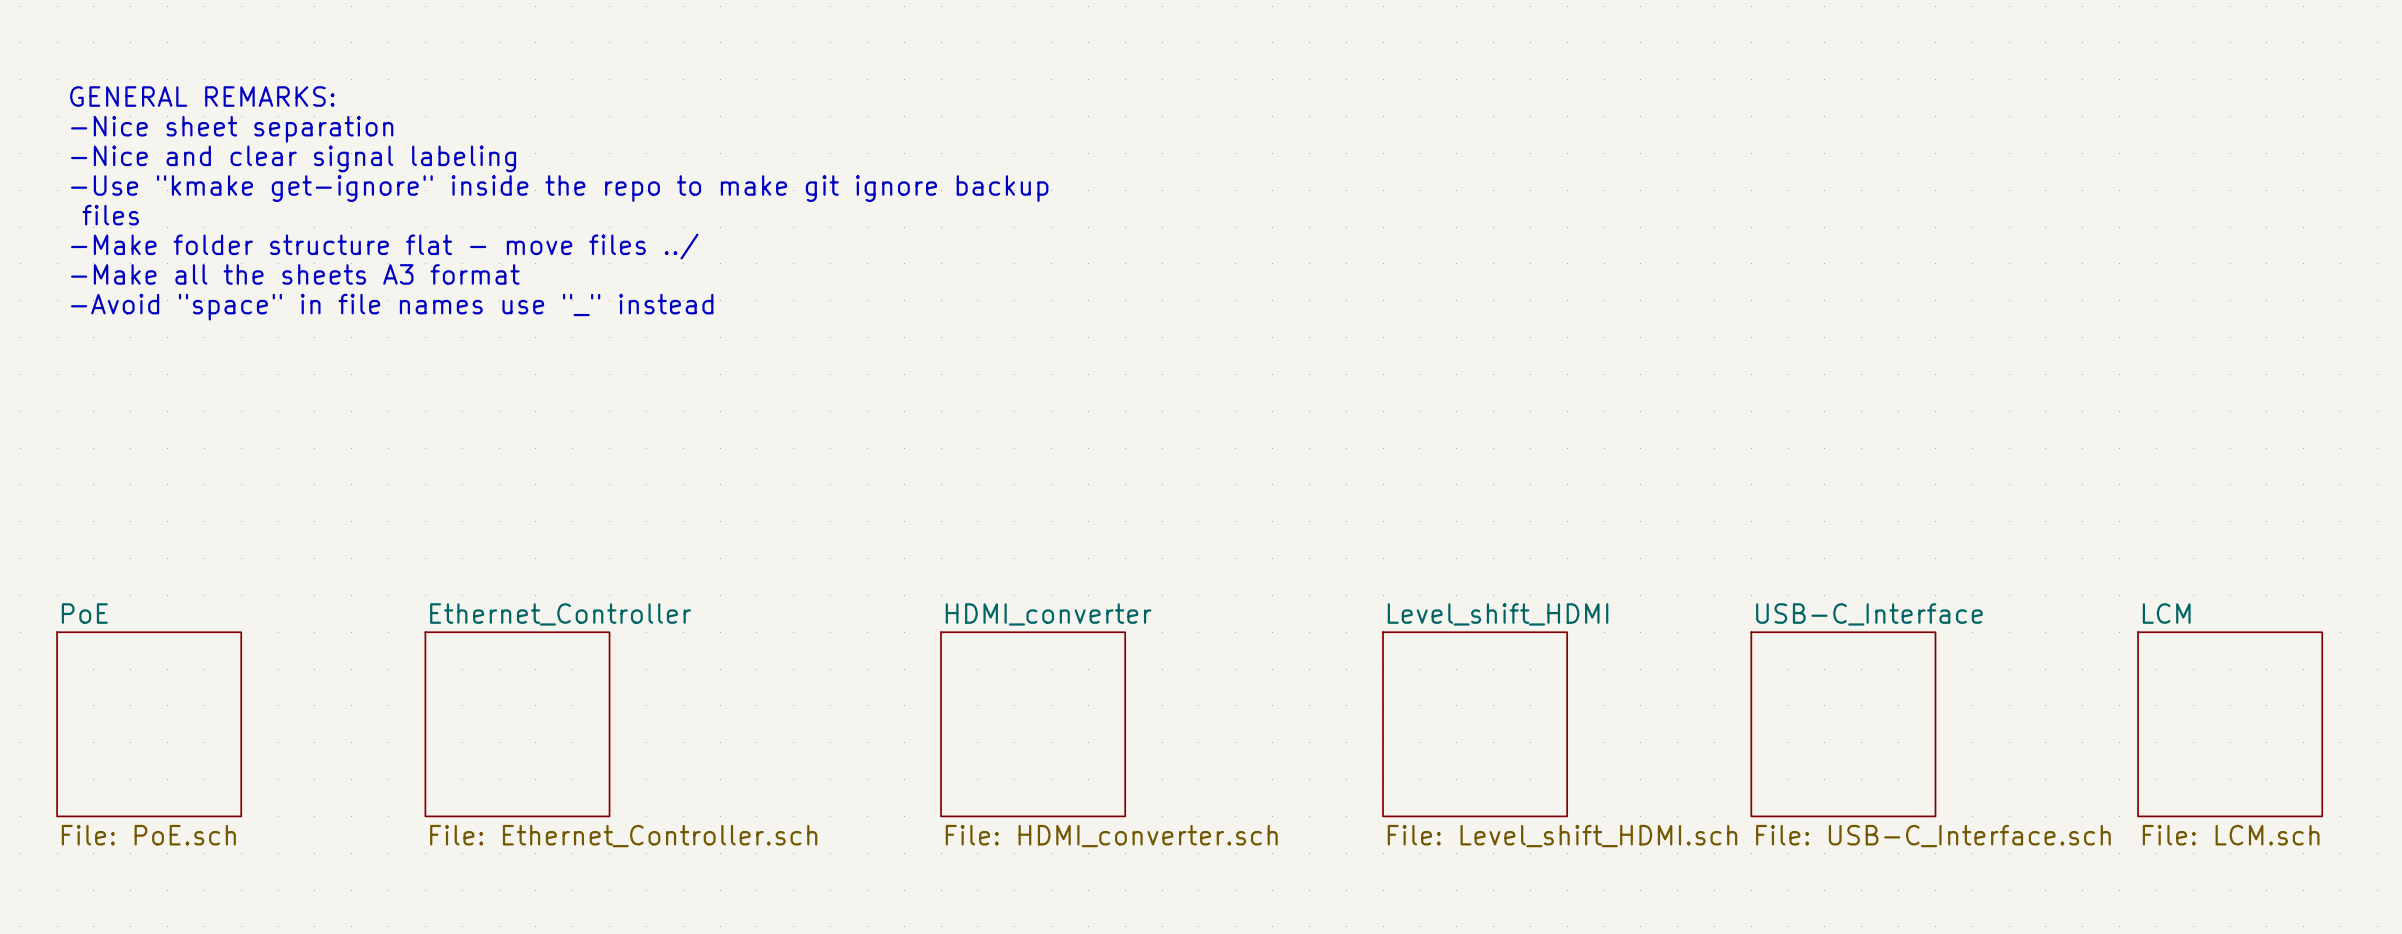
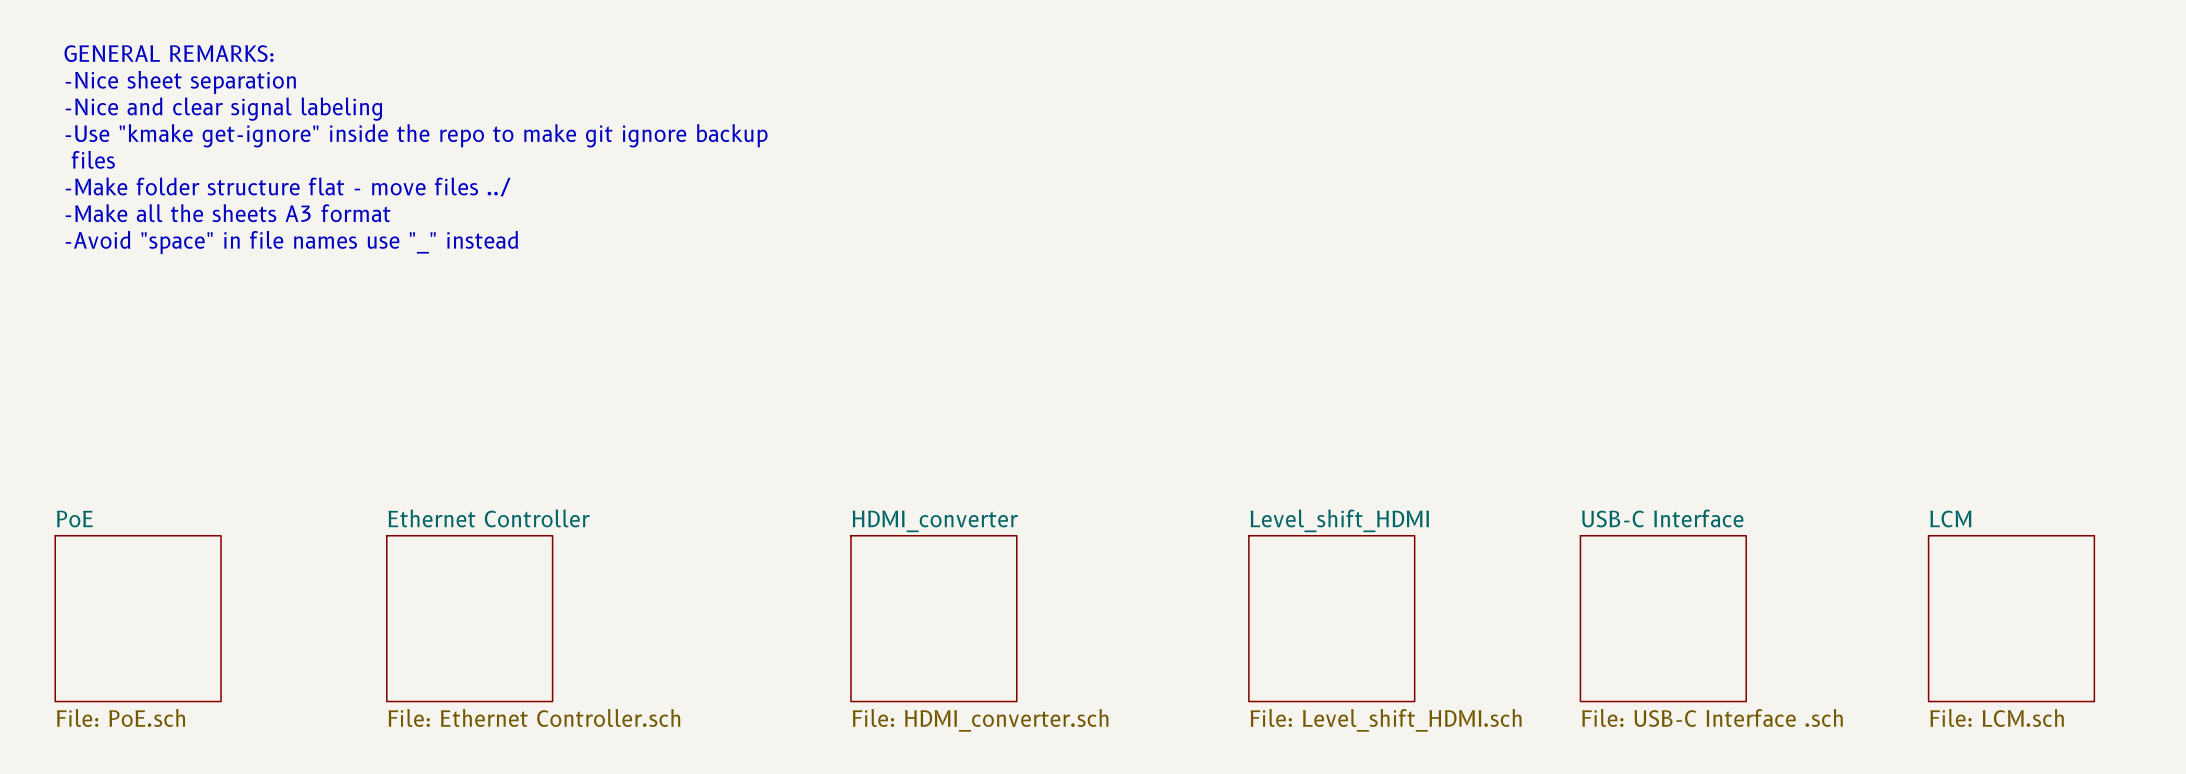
sheet Ethernet_Controller name: Ethernet_Controller (560, 614) -> Ethernet Controller (489, 518)
sheet USB-C_Interface name: USB-C_Interface (1869, 614) -> USB-C Interface (1662, 518)
sheet Ethernet_Controller value: File: Ethernet_Controller.sch (623, 836) -> File: Ethernet Controller.sch (534, 717)
sheet USB-C_Interface value: File: USB-C_Interface.sch (1933, 836) -> File: USB-C Interface .sch (1712, 717)

